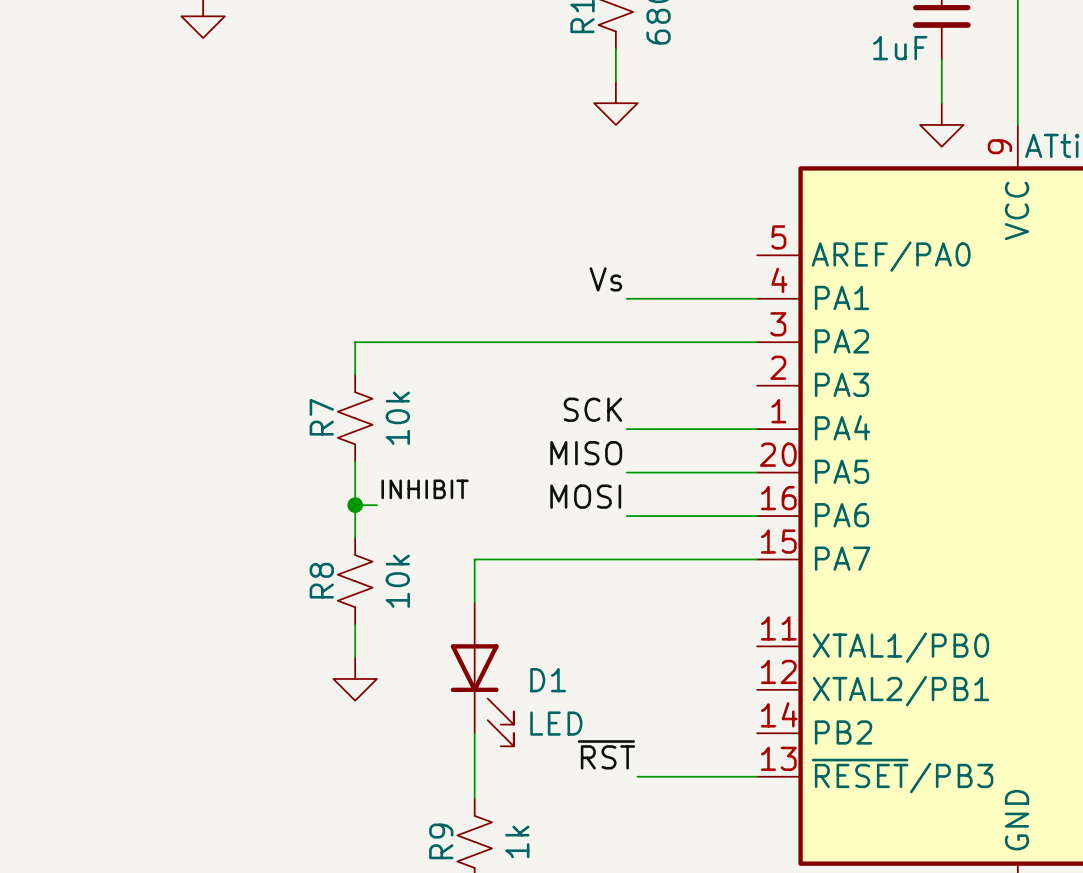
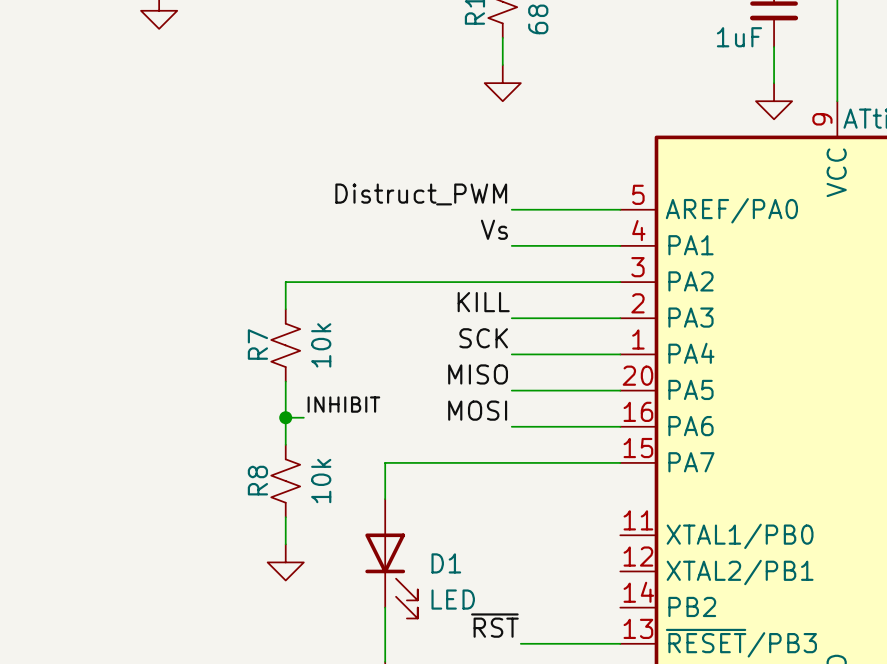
label: none -> Distruct_PWM (421, 194)
wire: none -> (511, 209) (620, 209)
label: none -> KILL (483, 302)
wire: none -> (511, 318) (620, 318)

